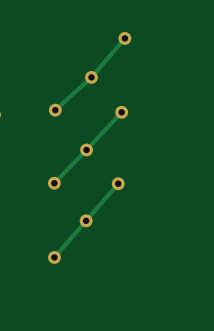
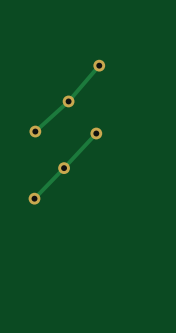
track: (118, 183) (54, 257) -> none
via: (118, 183) -> none
via: (86, 220) -> none
via: (54, 257) -> none

